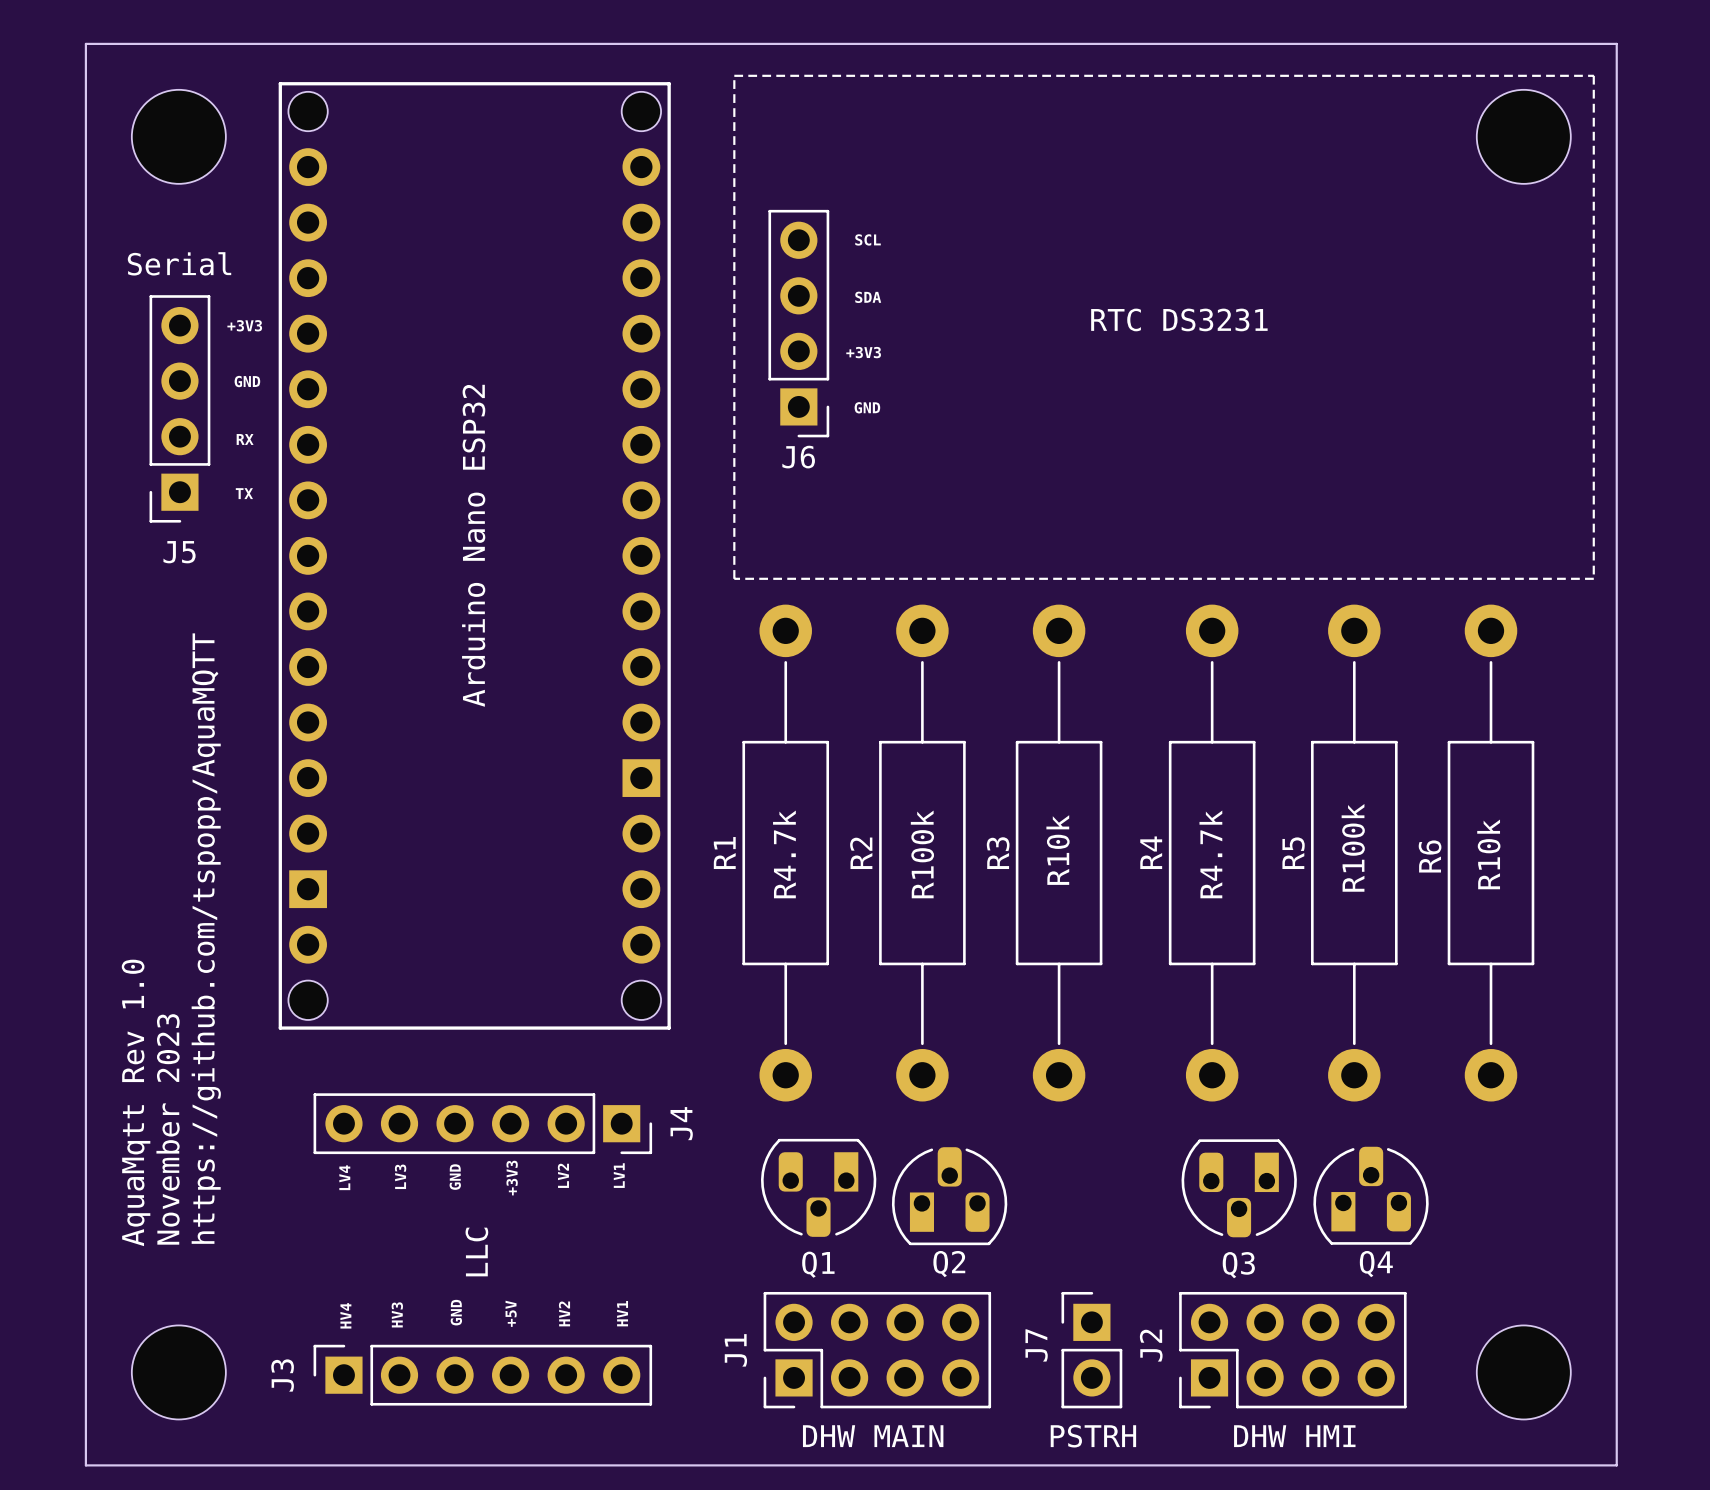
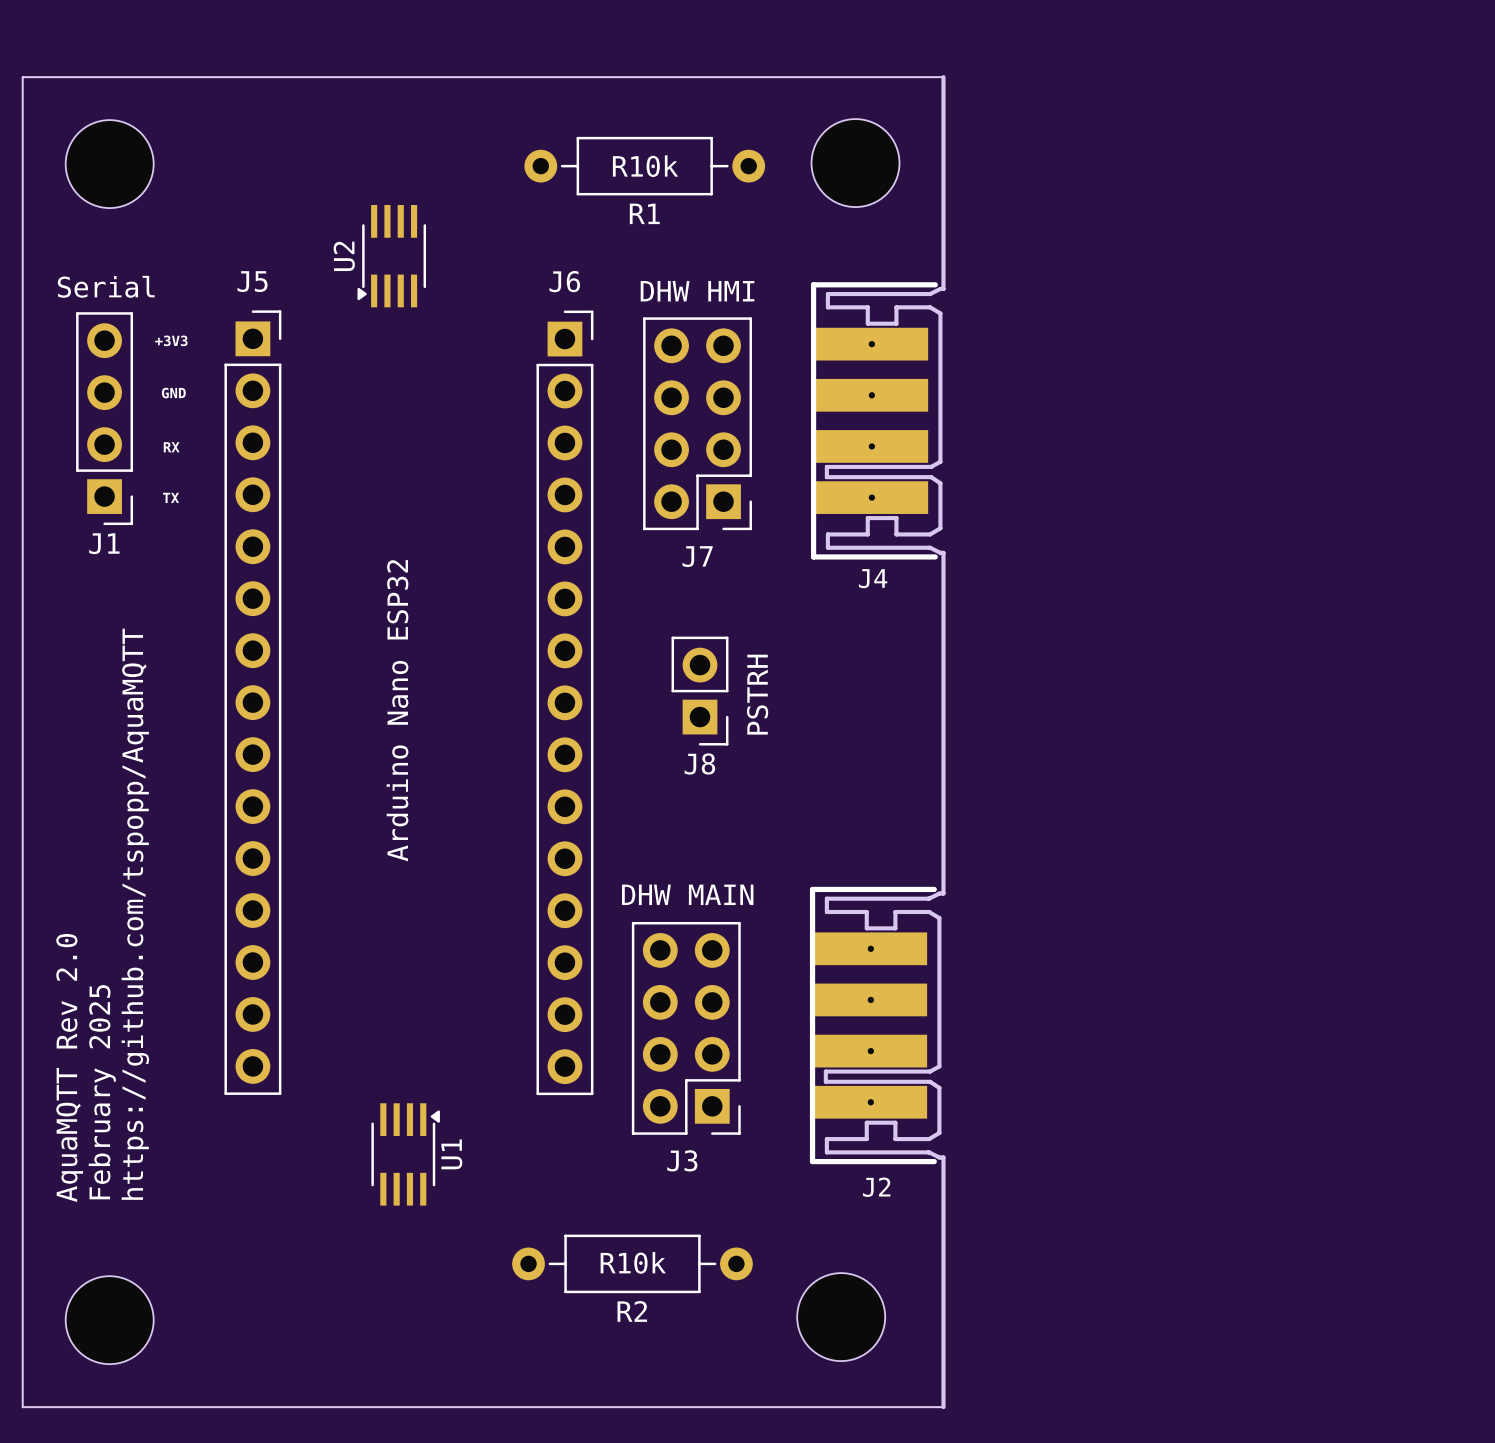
board edge: (1070, 43) (1616, 43) (1616, 1465) (1070, 1465) -> (939, 1157) (943, 1157) (943, 1407)
board edge: none -> (943, 77) (943, 288) (940, 288)
line: (734, 75) (1593, 75) (1593, 578) (734, 578) (734, 75) -> none
part: none -> (855, 163)
part: (1523, 136) -> none
J6 footprint: [768, 209, 830, 438] -> [536, 310, 594, 1096]
U2: none -> (391, 256)
text: SCL (868, 239) -> none
J5 value: Serial (179, 263) -> none
J7 value: none -> DHW HMI (697, 291)
J5 footprint: [149, 295, 211, 523] -> [224, 310, 282, 1095]
text: SDA (868, 297) -> none
J6 value: RTC DS3231 (1179, 319) -> none
text: +3V3 (863, 352) -> none
text: GND (867, 407) -> none
J6 name position: J6 (798, 457) -> J6 (564, 281)
J5 name position: J5 (179, 552) -> J5 (252, 281)
board edge: none -> (940, 552) (943, 552) (943, 893) (939, 893)
part: Arduino Nano ESP32 (474, 555) -> none
R1 footprint: [742, 604, 830, 1102] -> [524, 136, 766, 196]
R2 footprint: [879, 604, 966, 1102] -> [512, 1234, 753, 1294]
J8: none -> (700, 691)
text: none -> PSTRH (757, 694)
text: none -> Arduino Nano ESP32 (397, 710)
R1 name position: R1 (724, 853) -> R1 (644, 213)
R2 name position: R2 (861, 853) -> R2 (632, 1311)
R3: R10k (1059, 853) -> none
R4: R4.7k (1212, 853) -> none
R5: R100k (1354, 853) -> none
R6: R10k (1491, 853) -> none
R1 value: R4.7k (784, 854) -> R10k (645, 166)
R2 value: R100k (922, 854) -> R10k (633, 1262)
J3 value: none -> DHW MAIN (687, 894)
J4 footprint: [313, 1093, 653, 1155] -> [810, 282, 943, 560]
text: AquaMqtt Rev 1.0 (136, 1102) -> AquaMQTT Rev 2.0 (69, 1067)
J4 name position: J4 (681, 1123) -> J4 (873, 578)
text: November 2023 (168, 1129) -> February 2025 (102, 1092)
text: LV2 (563, 1175) -> none
text: LV1 (619, 1175) -> none
text: LV3 (400, 1176) -> none
text: LV4 (344, 1177) -> none
text: GND (455, 1177) -> none
text: +3V3 (512, 1178) -> none
Q1: (818, 1187) -> none
Q3: (1239, 1188) -> none
U1: none -> (405, 1154)
Q4: (1371, 1195) -> none
Q2: (949, 1196) -> none
text: LLC (476, 1252) -> none
J1 footprint: [763, 1291, 992, 1409] -> [76, 312, 134, 526]
J7 footprint: [1061, 1291, 1123, 1409] -> [643, 317, 752, 531]
J2 footprint: [1179, 1291, 1407, 1409] -> [809, 886, 942, 1165]
text: GND (456, 1312) -> none
text: +5V (511, 1313) -> none
text: HV2 (564, 1313) -> none
text: HV1 (622, 1313) -> none
text: HV3 (397, 1314) -> none
text: HV4 (345, 1315) -> none
J3 footprint: [313, 1344, 653, 1406] -> [631, 921, 741, 1135]
J7 name position: J7 (1036, 1345) -> J7 (697, 556)
J2 name position: J2 (1151, 1345) -> J2 (876, 1187)
J1 name position: J1 (735, 1350) -> J1 (104, 543)
part: none -> (841, 1317)
part: (1523, 1372) -> none
J3 name position: J3 (282, 1375) -> J3 (682, 1160)
J1 value: DHW MAIN (873, 1436) -> Serial (106, 286)
text: PSTRH (1093, 1436) -> none
J2 value: DHW HMI (1294, 1436) -> none

